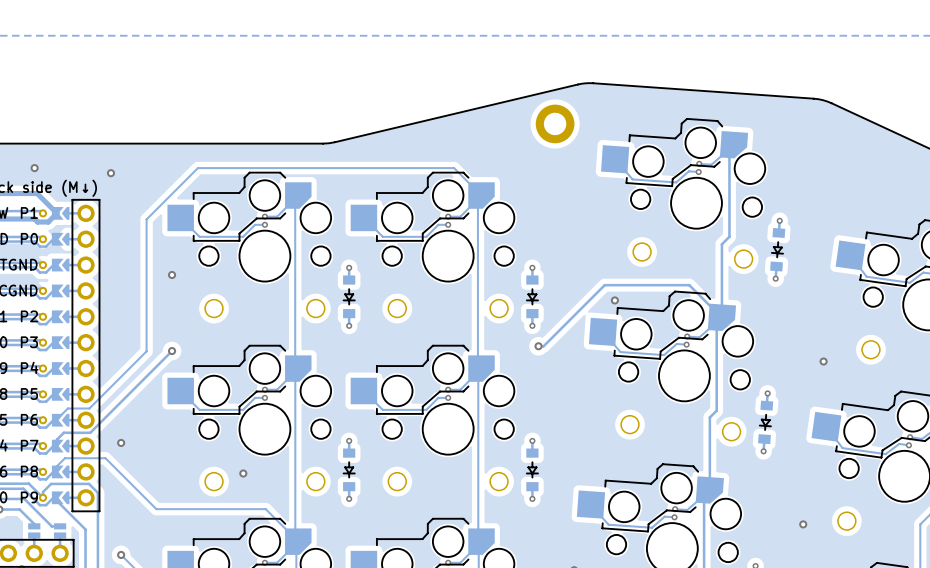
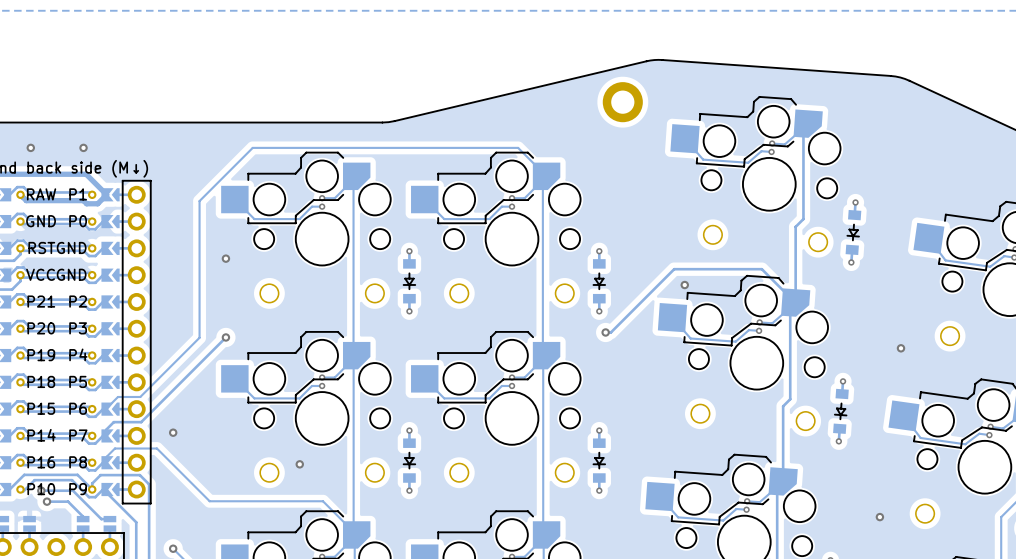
via: (110, 173) -> none

